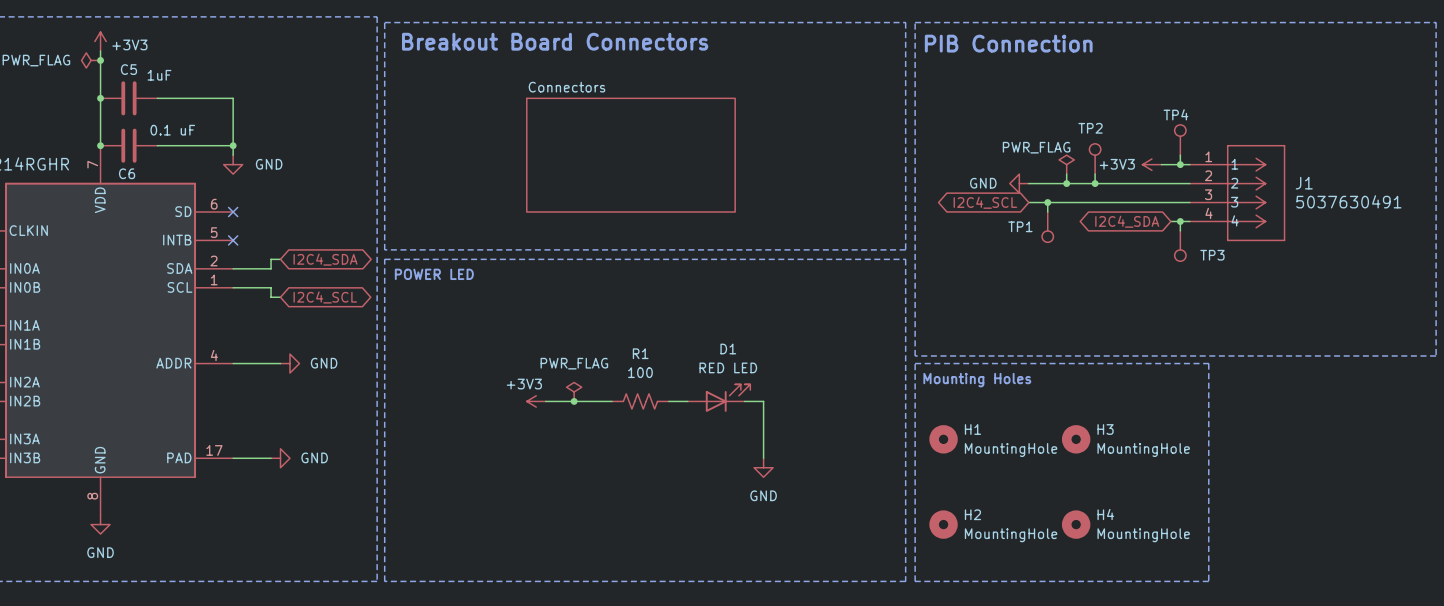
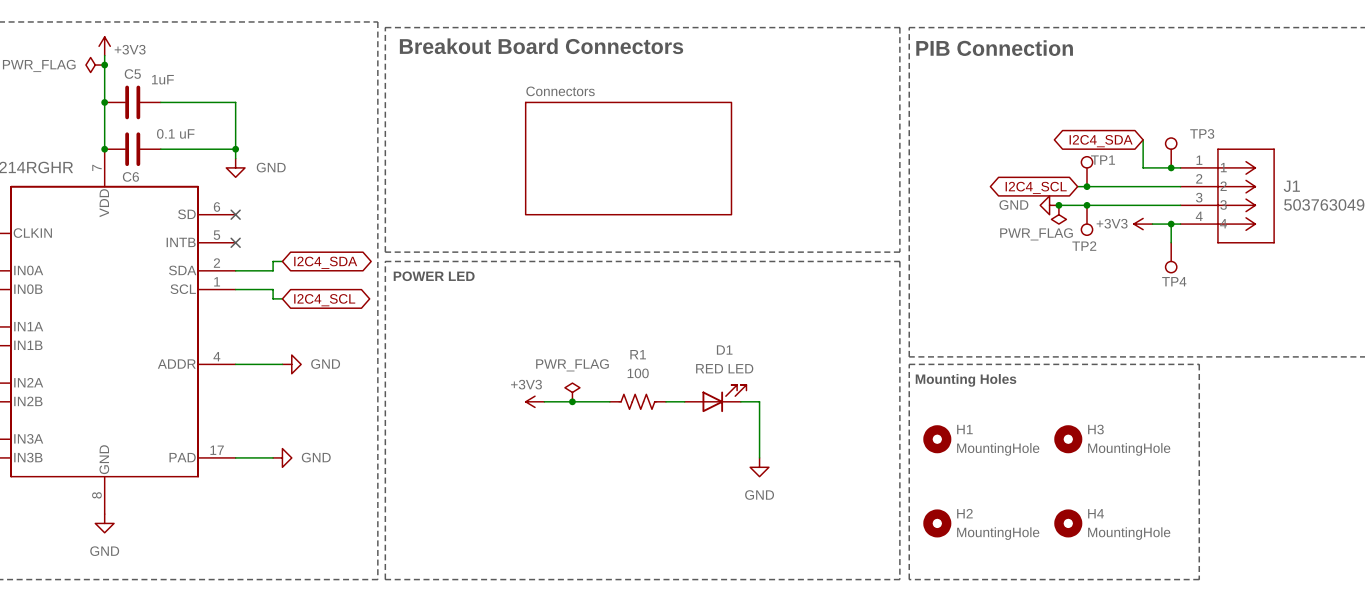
TP4 rotation: 0° (1180, 130) -> 180° (1171, 267)
wire: none -> (1143, 139) (1143, 167) (1152, 167)
TP4 position: (1180, 140) -> (1171, 257)
power symbol text position: PWR_FLAG (1036, 147) -> PWR_FLAG (1036, 234)
TP2 rotation: 0° (1095, 149) -> 180° (1086, 229)
TP2 position: (1095, 158) -> (1086, 220)
power symbol rotation: 0° (1066, 164) -> 180° (1058, 214)
power symbol position: PWR_FLAG (1066, 164) -> PWR_FLAG (1058, 214)
power symbol position: +3V3 (1151, 164) -> +3V3 (1143, 224)
wire: (1066, 174) (1066, 183) -> none
power symbol position: GND (1019, 183) -> GND (1049, 205)
wire: (1028, 183) (1085, 183) -> none
junction: (1066, 183) -> none
global label position: I2C4_SCL (985, 202) -> I2C4_SCL (1036, 187)
wire: (1028, 202) (1066, 202) -> none
wire: (1047, 202) (1047, 212) -> none
junction: (1047, 202) -> none
junction: none -> (1058, 205)
junction: none -> (1086, 205)
global label position: I2C4_SDA (1127, 221) -> I2C4_SDA (1101, 141)
wire: none -> (1152, 224) (1161, 224)
TP1 position: (1047, 227) -> (1086, 171)
TP1 rotation: 0° (1047, 236) -> 180° (1086, 162)
TP3 position: (1180, 246) -> (1171, 152)
TP3 rotation: 0° (1180, 255) -> 180° (1171, 143)
TP3 name position: TP3 (1212, 255) -> TP3 (1202, 133)

